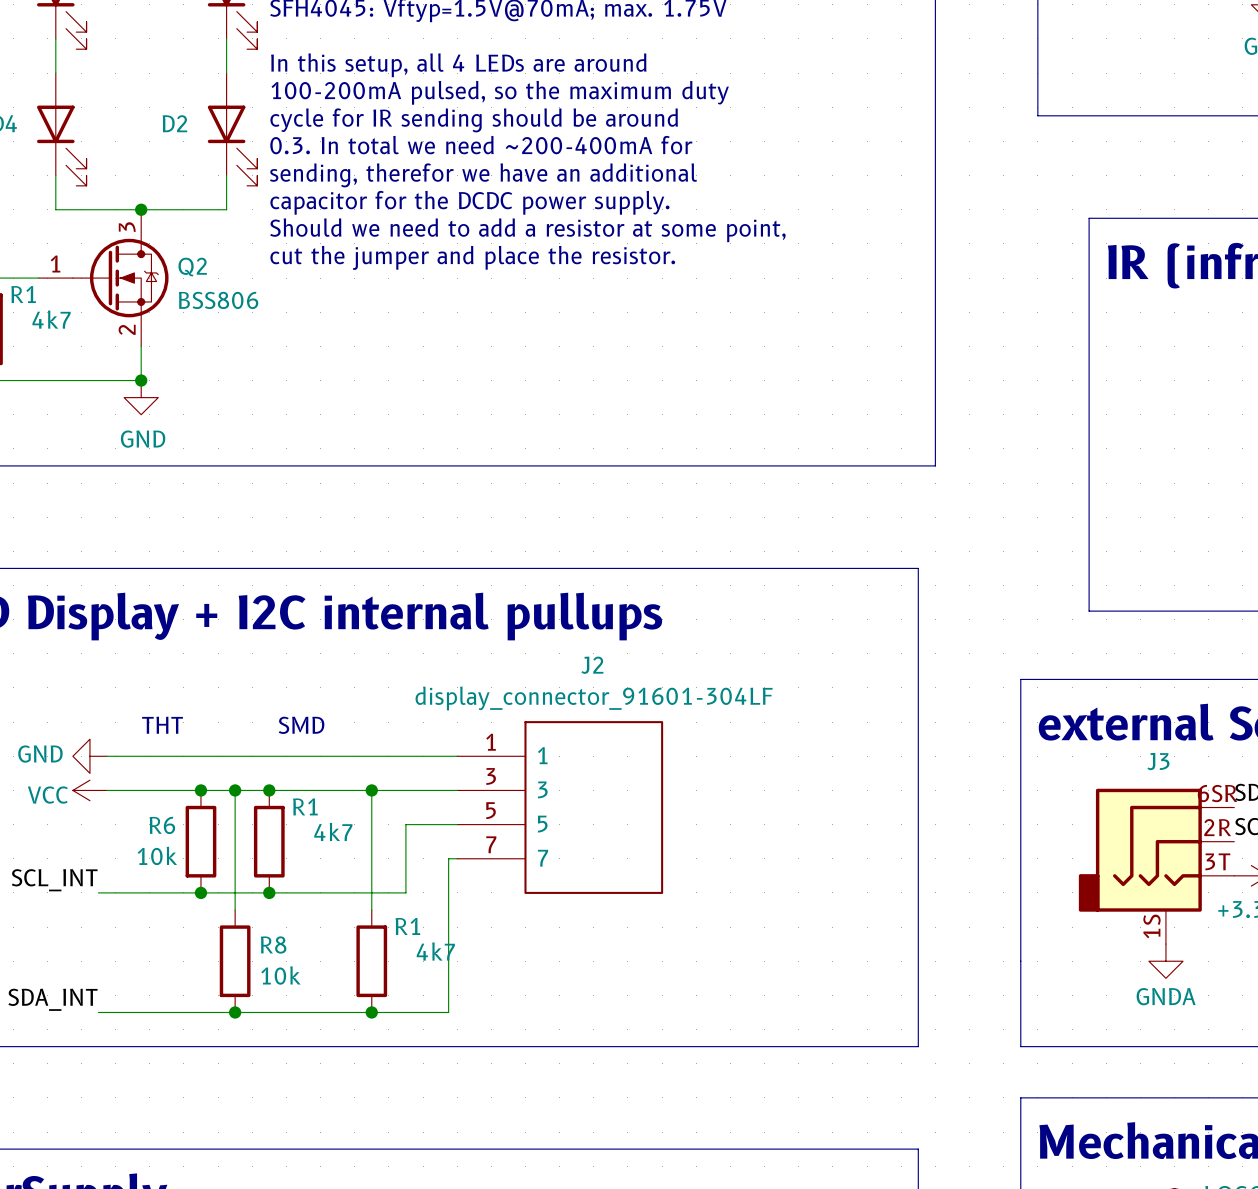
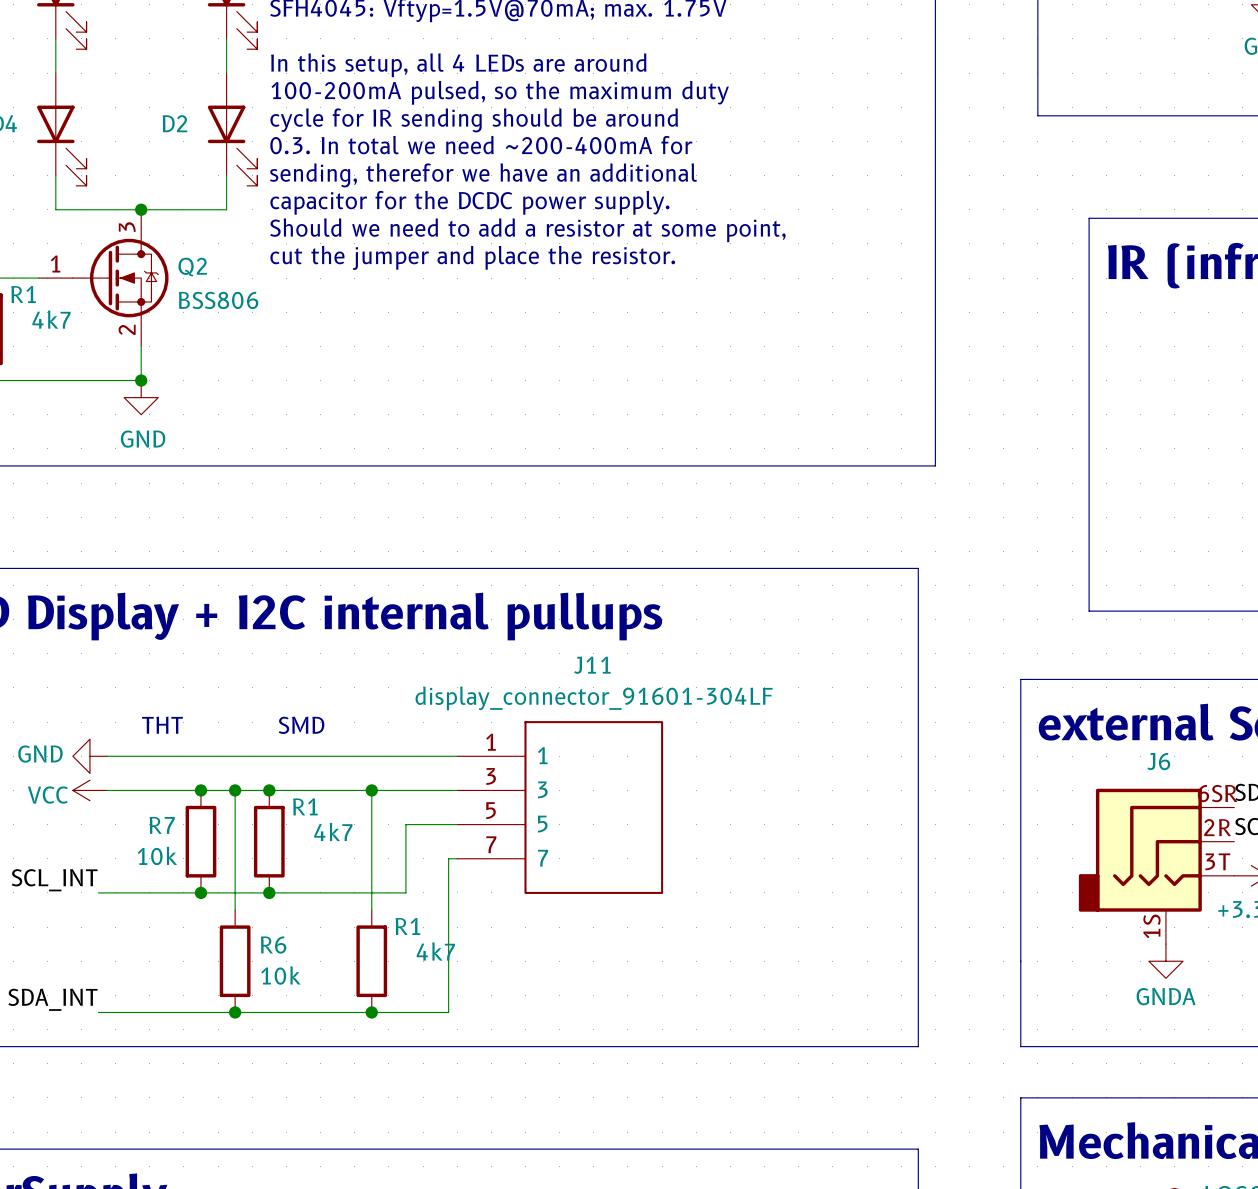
J2 name: J2 (592, 665) -> J11 (592, 665)
J3 name: J3 (1158, 761) -> J6 (1158, 761)
R6 name: R6 (162, 825) -> R7 (162, 825)
R8 name: R8 (273, 945) -> R6 (273, 945)

